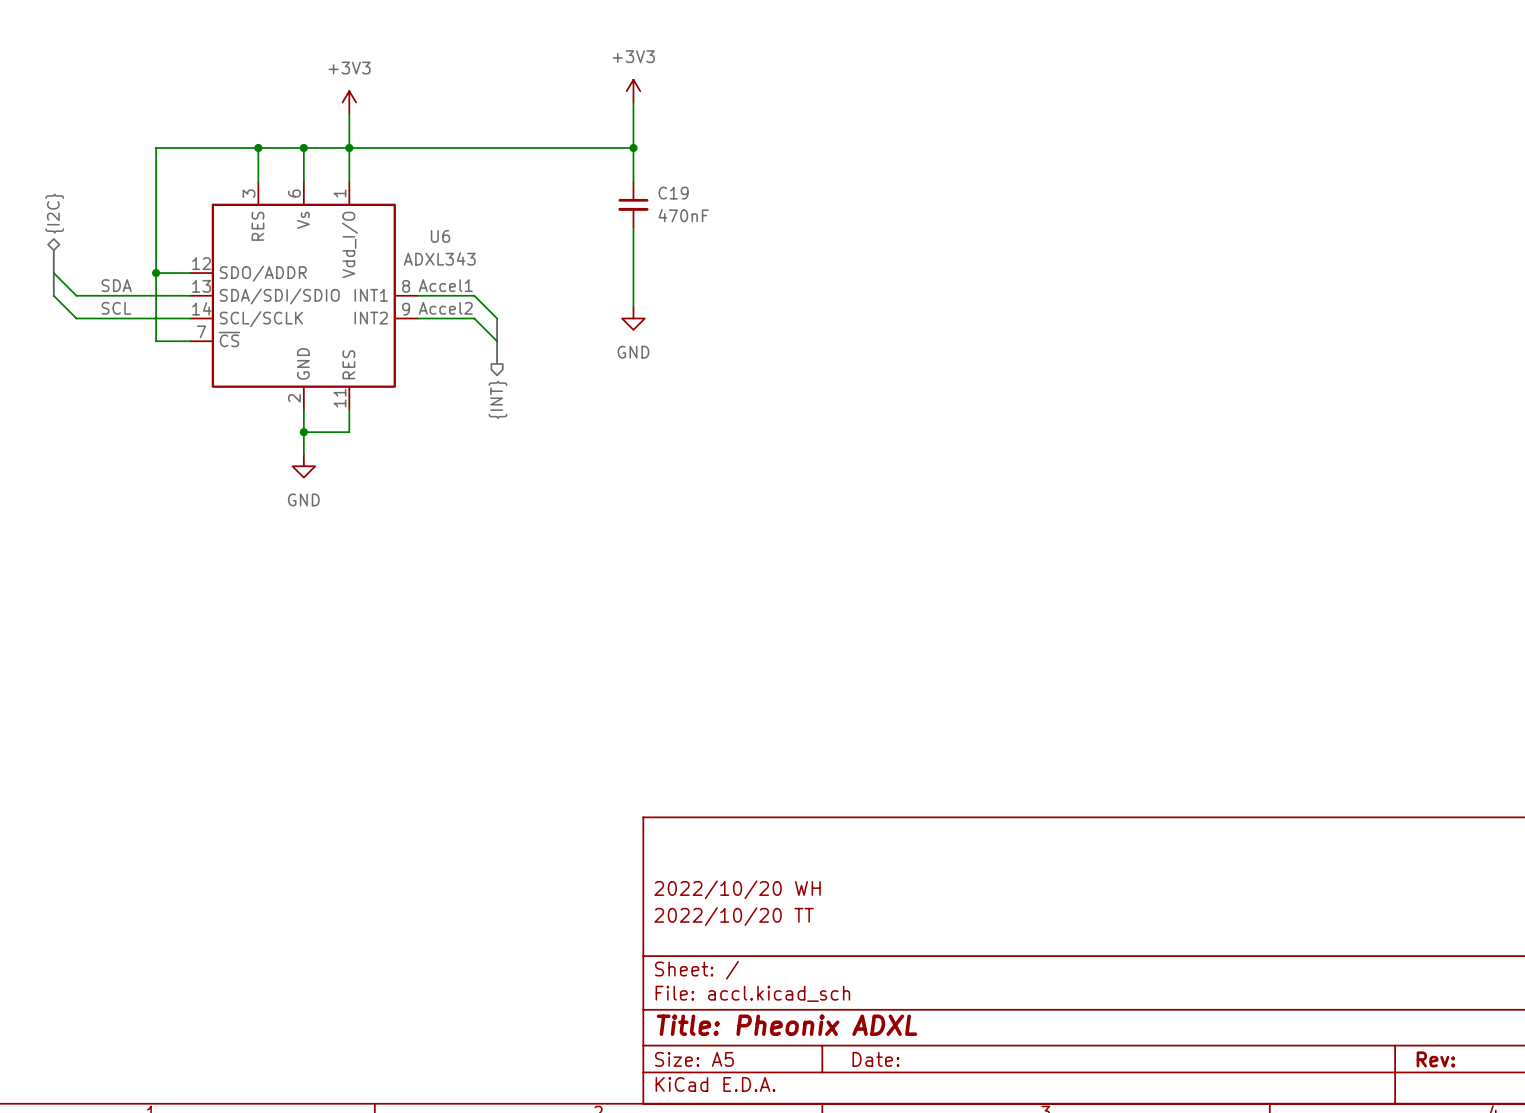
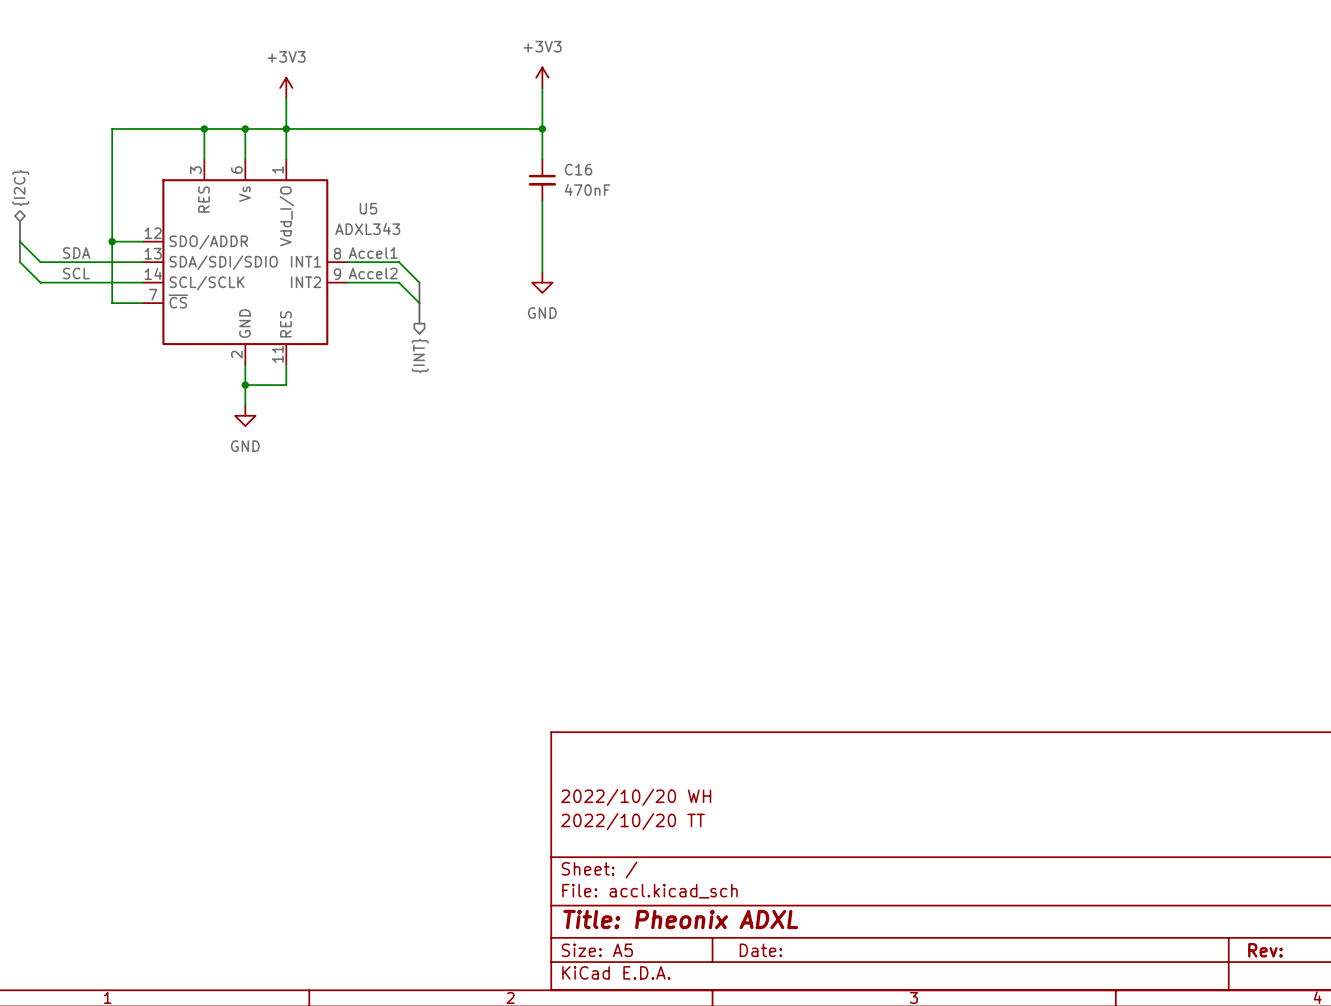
C19 name: C19 (673, 193) -> C16 (578, 169)
U6 name: U6 (440, 236) -> U5 (368, 208)

